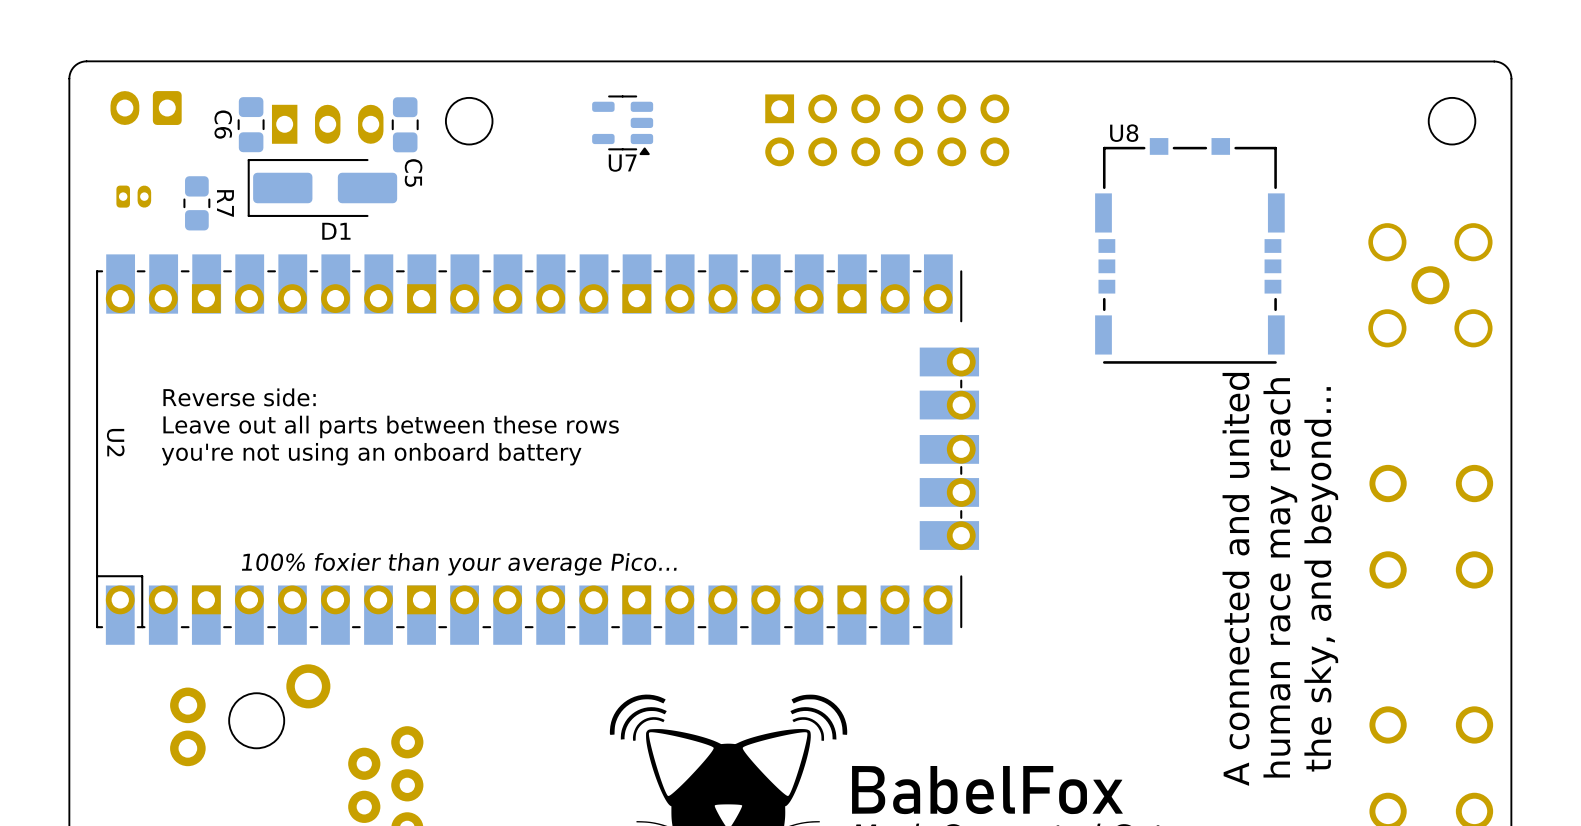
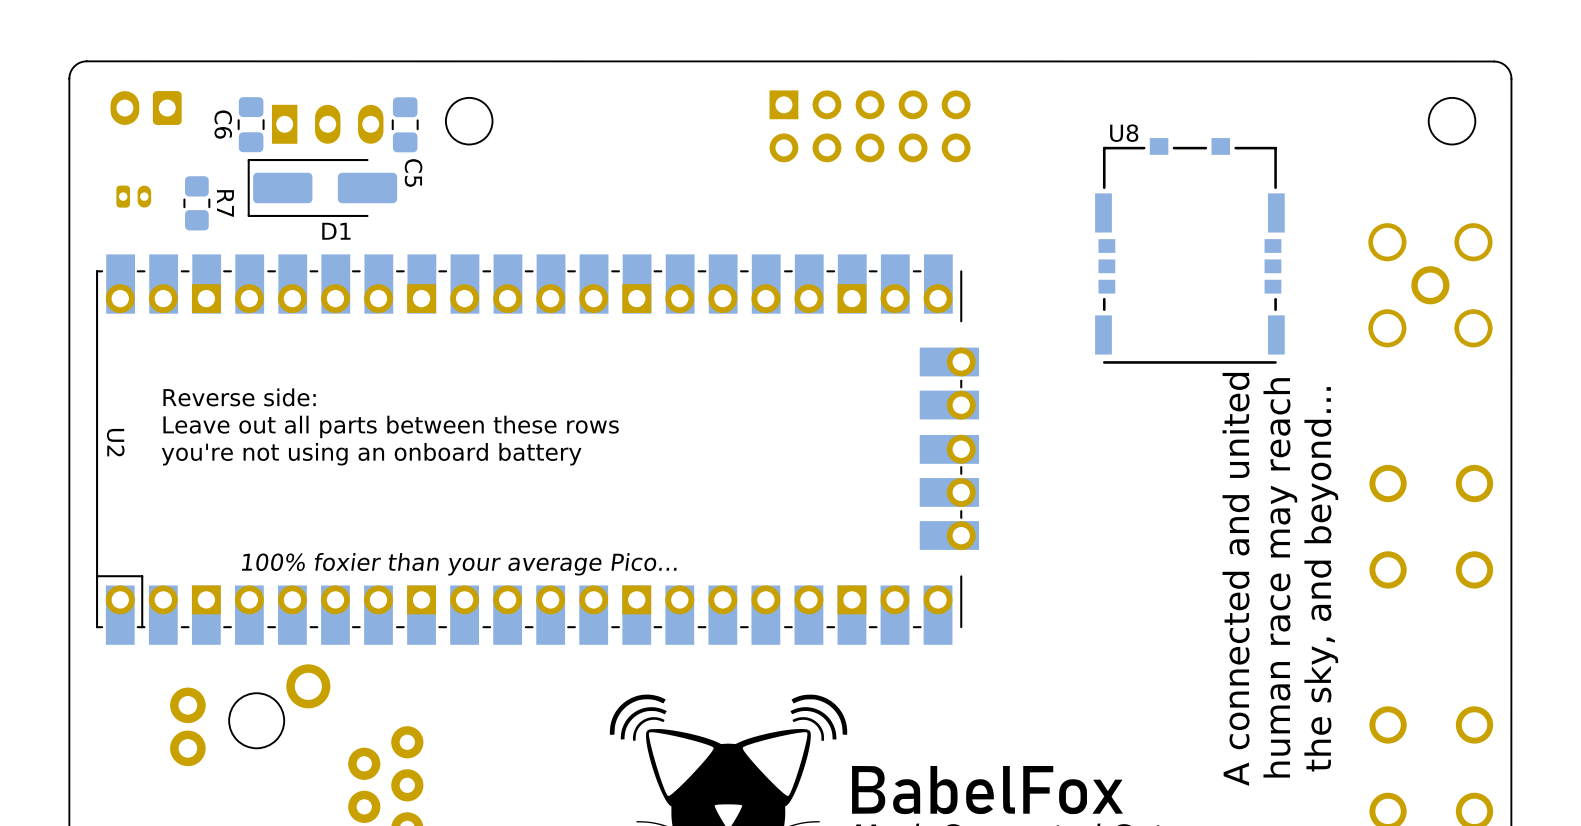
U7: (622, 125) -> none
part: none -> (870, 126)
part: (887, 130) -> none

